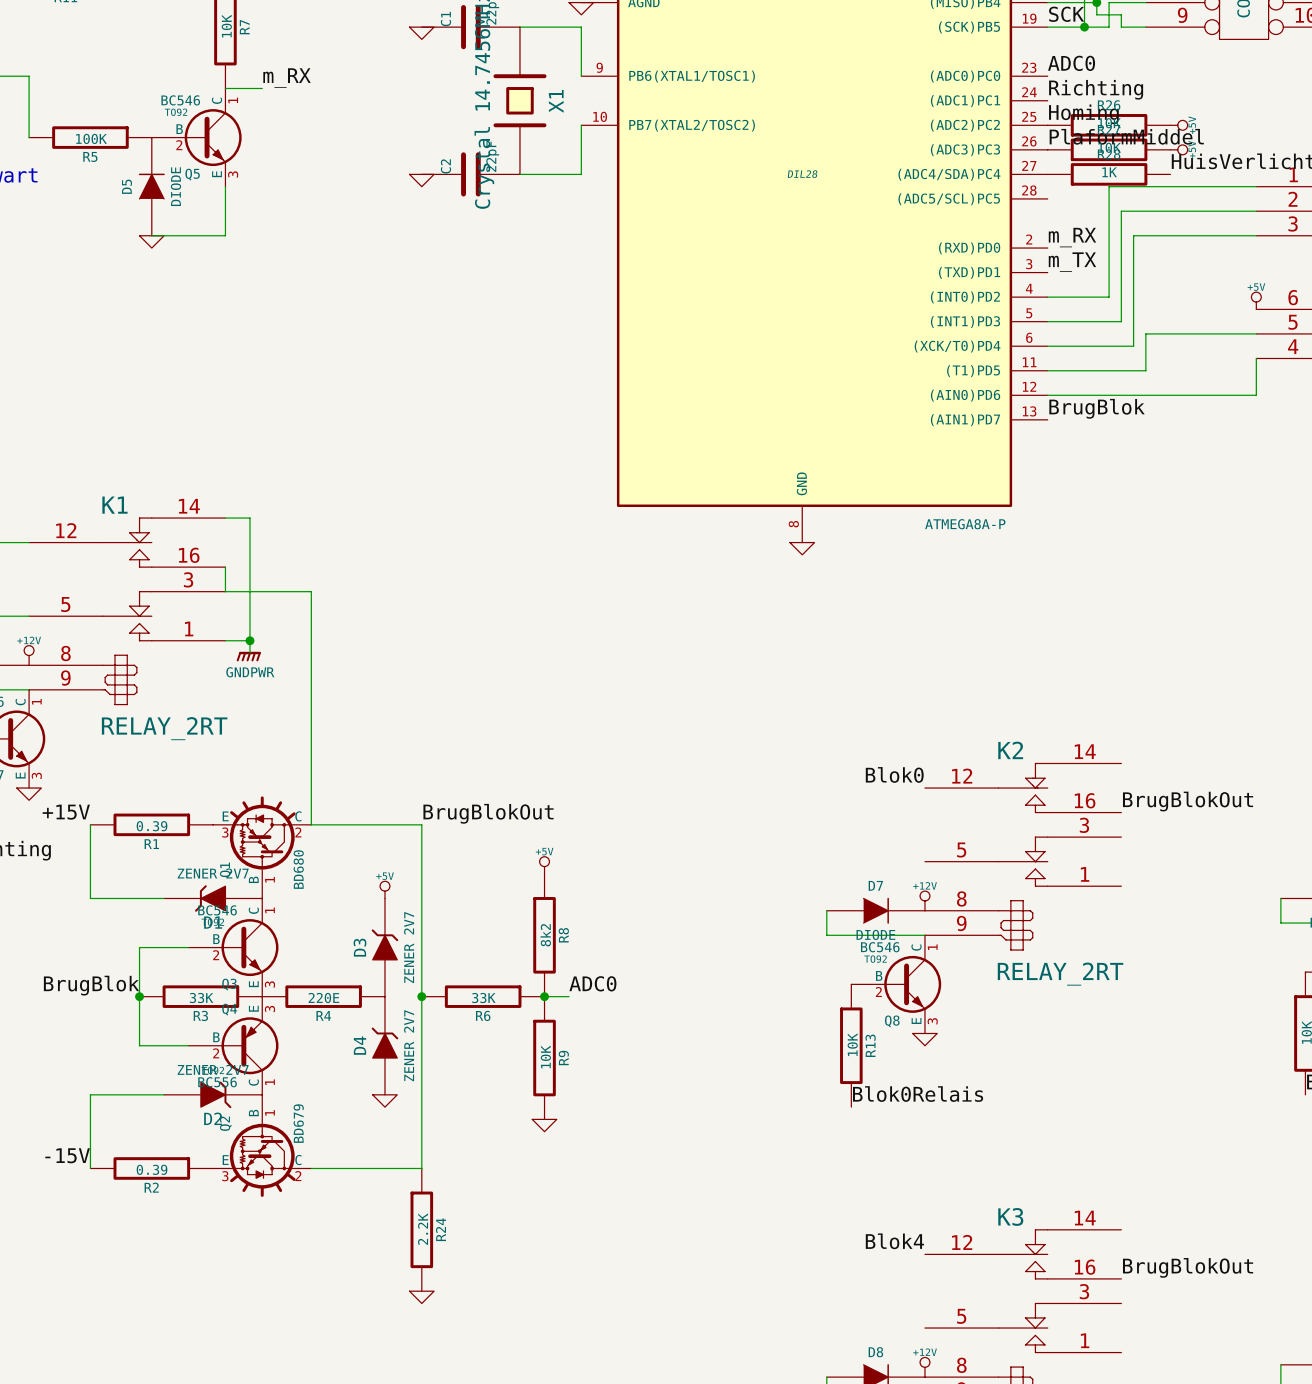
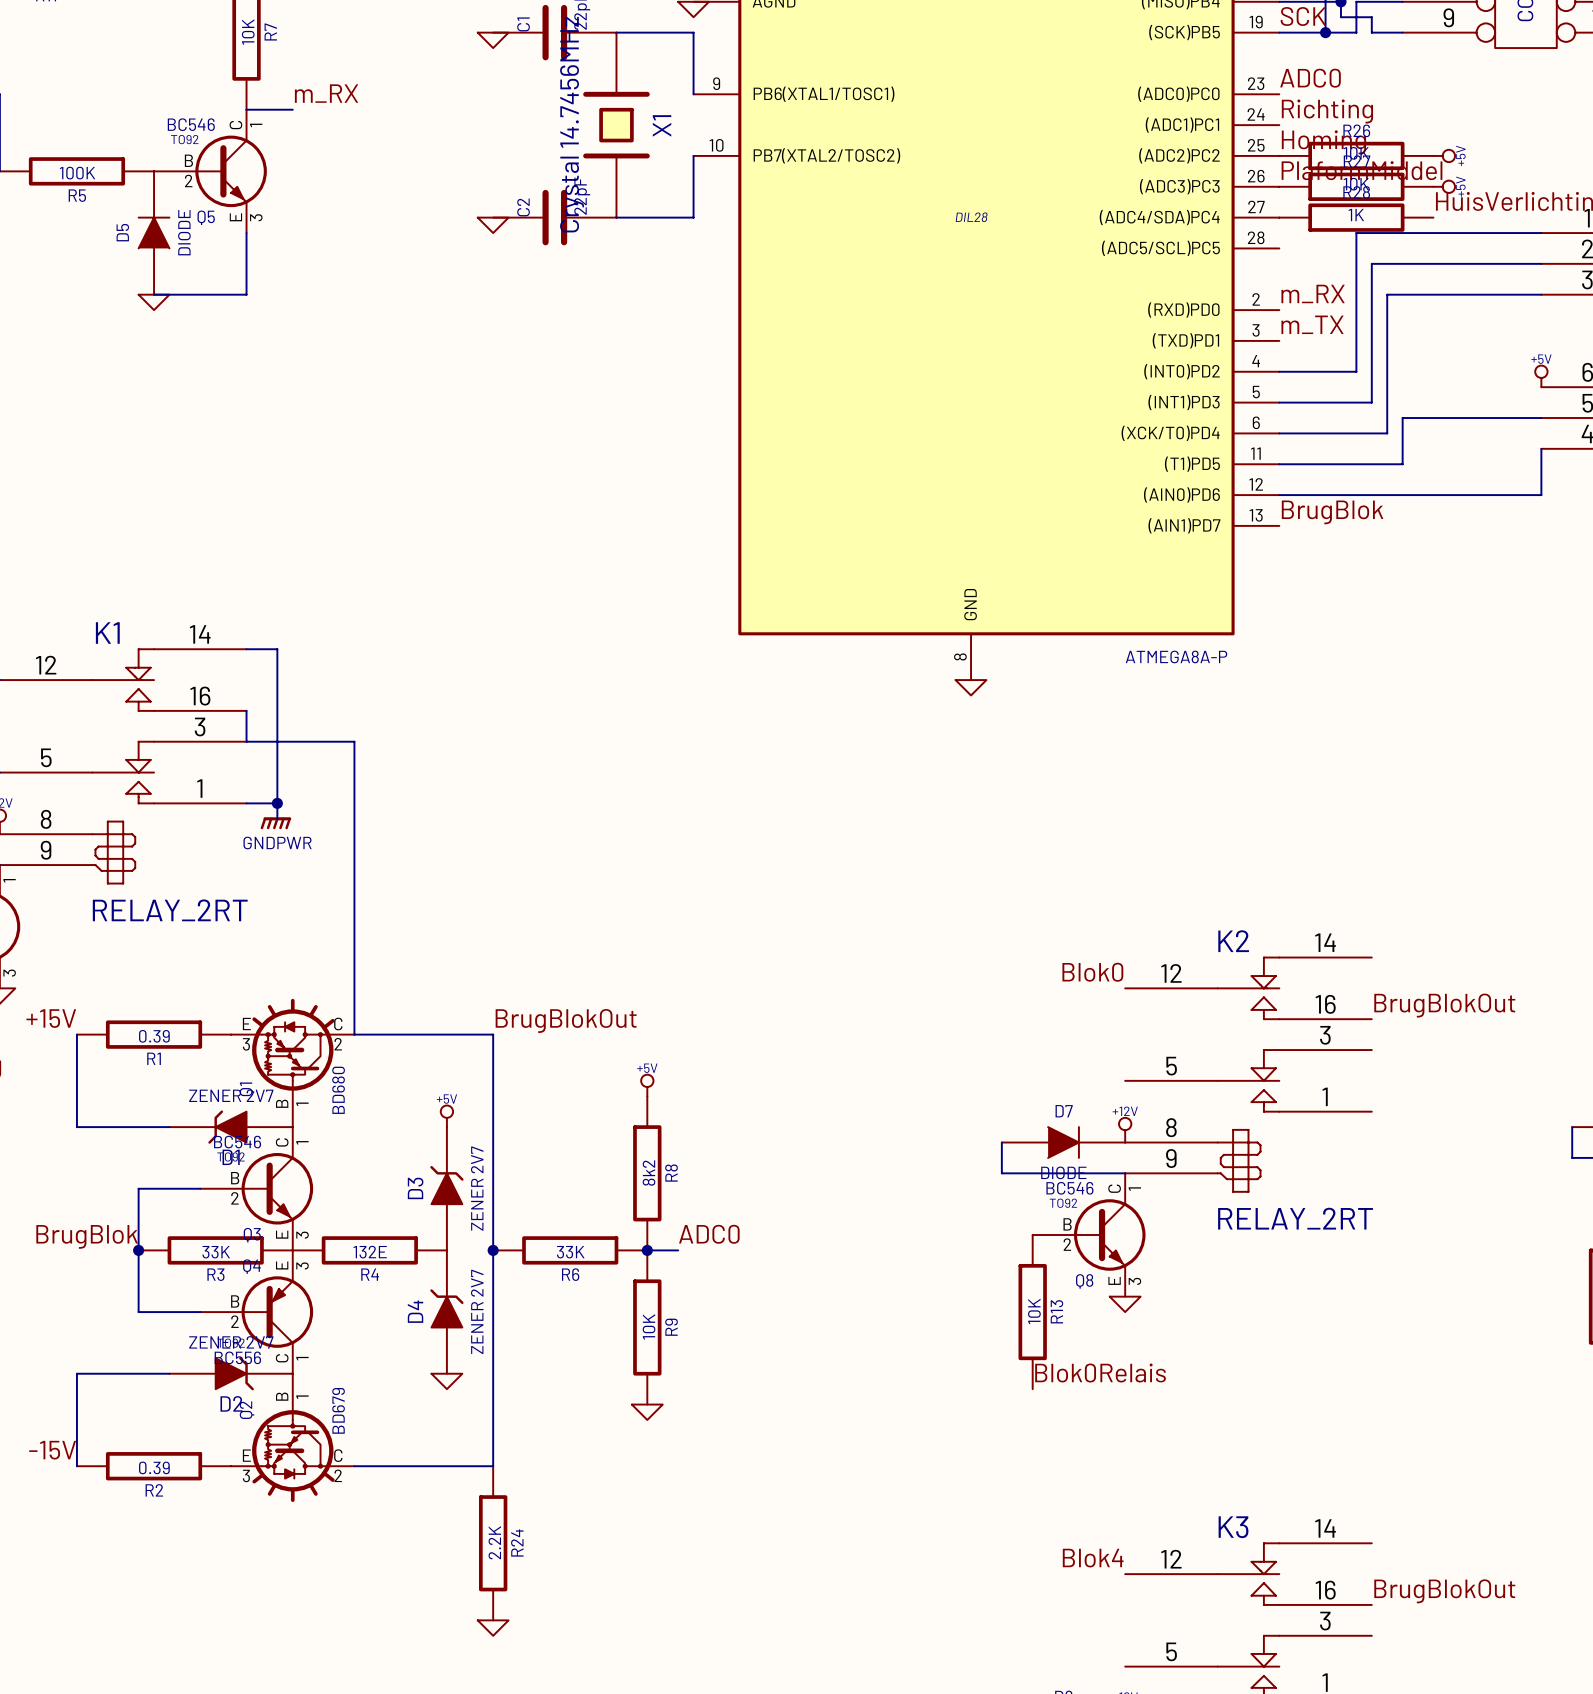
R4 value: 220E (323, 998) -> 132E (370, 1252)

